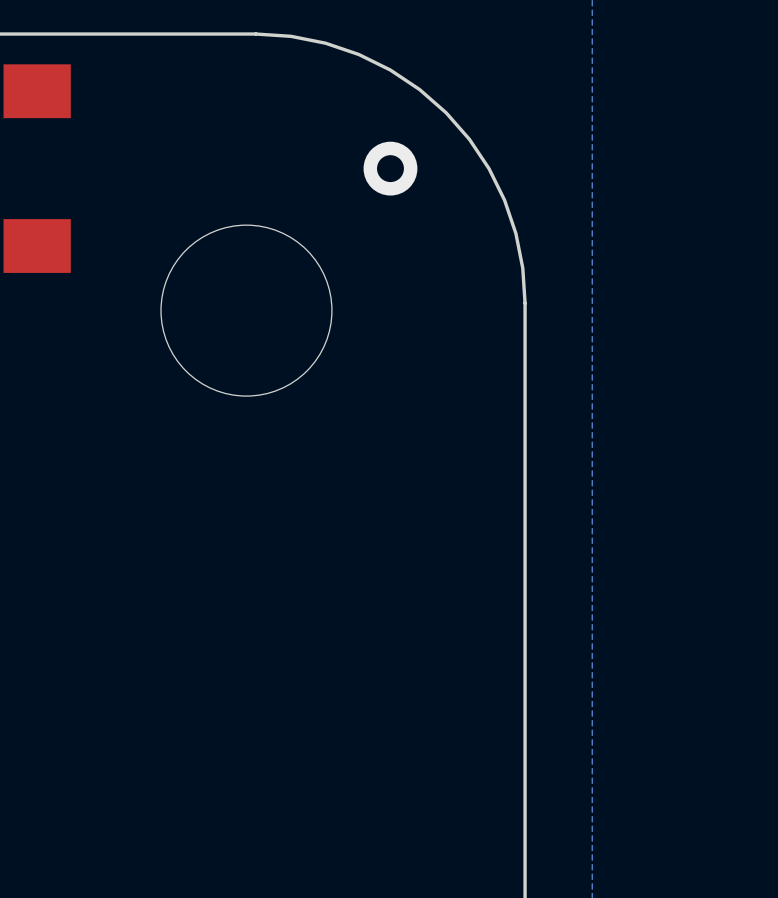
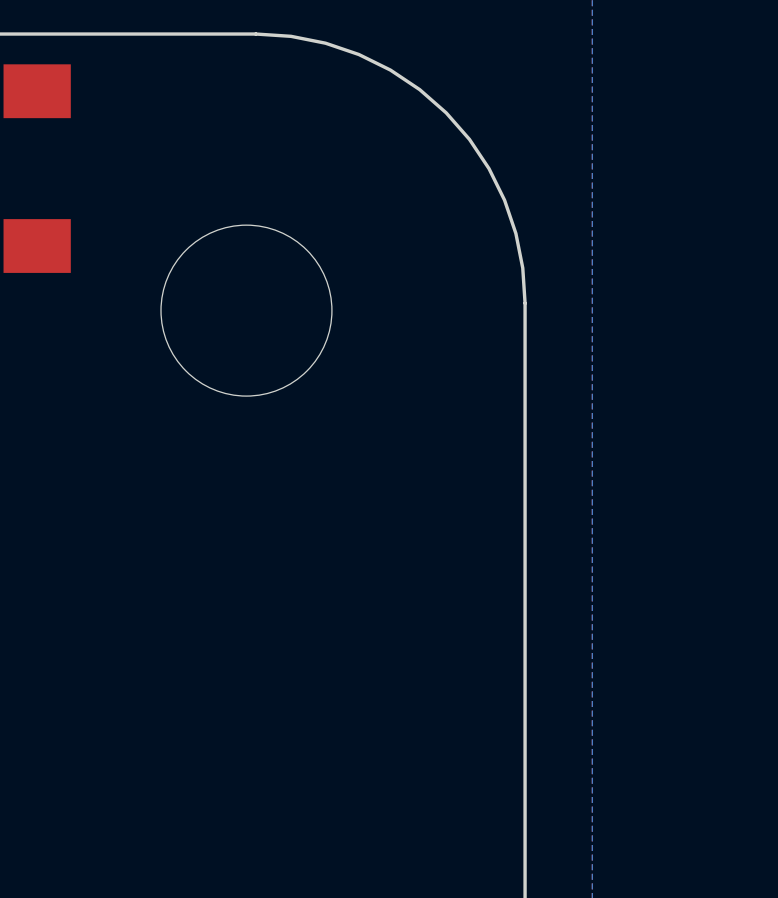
via: (390, 168) -> none

